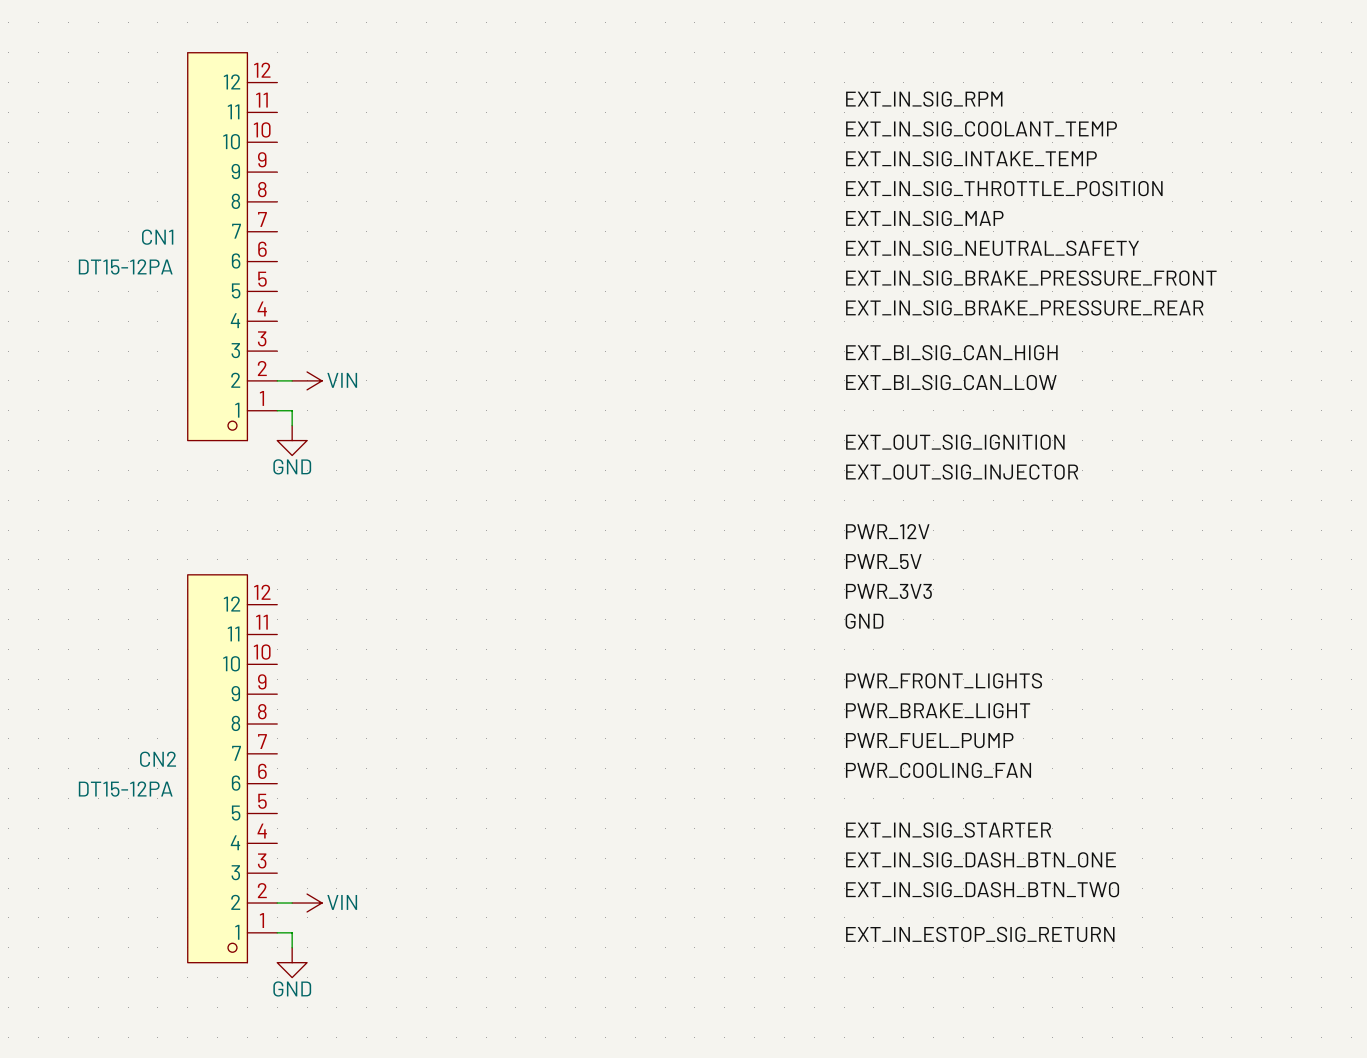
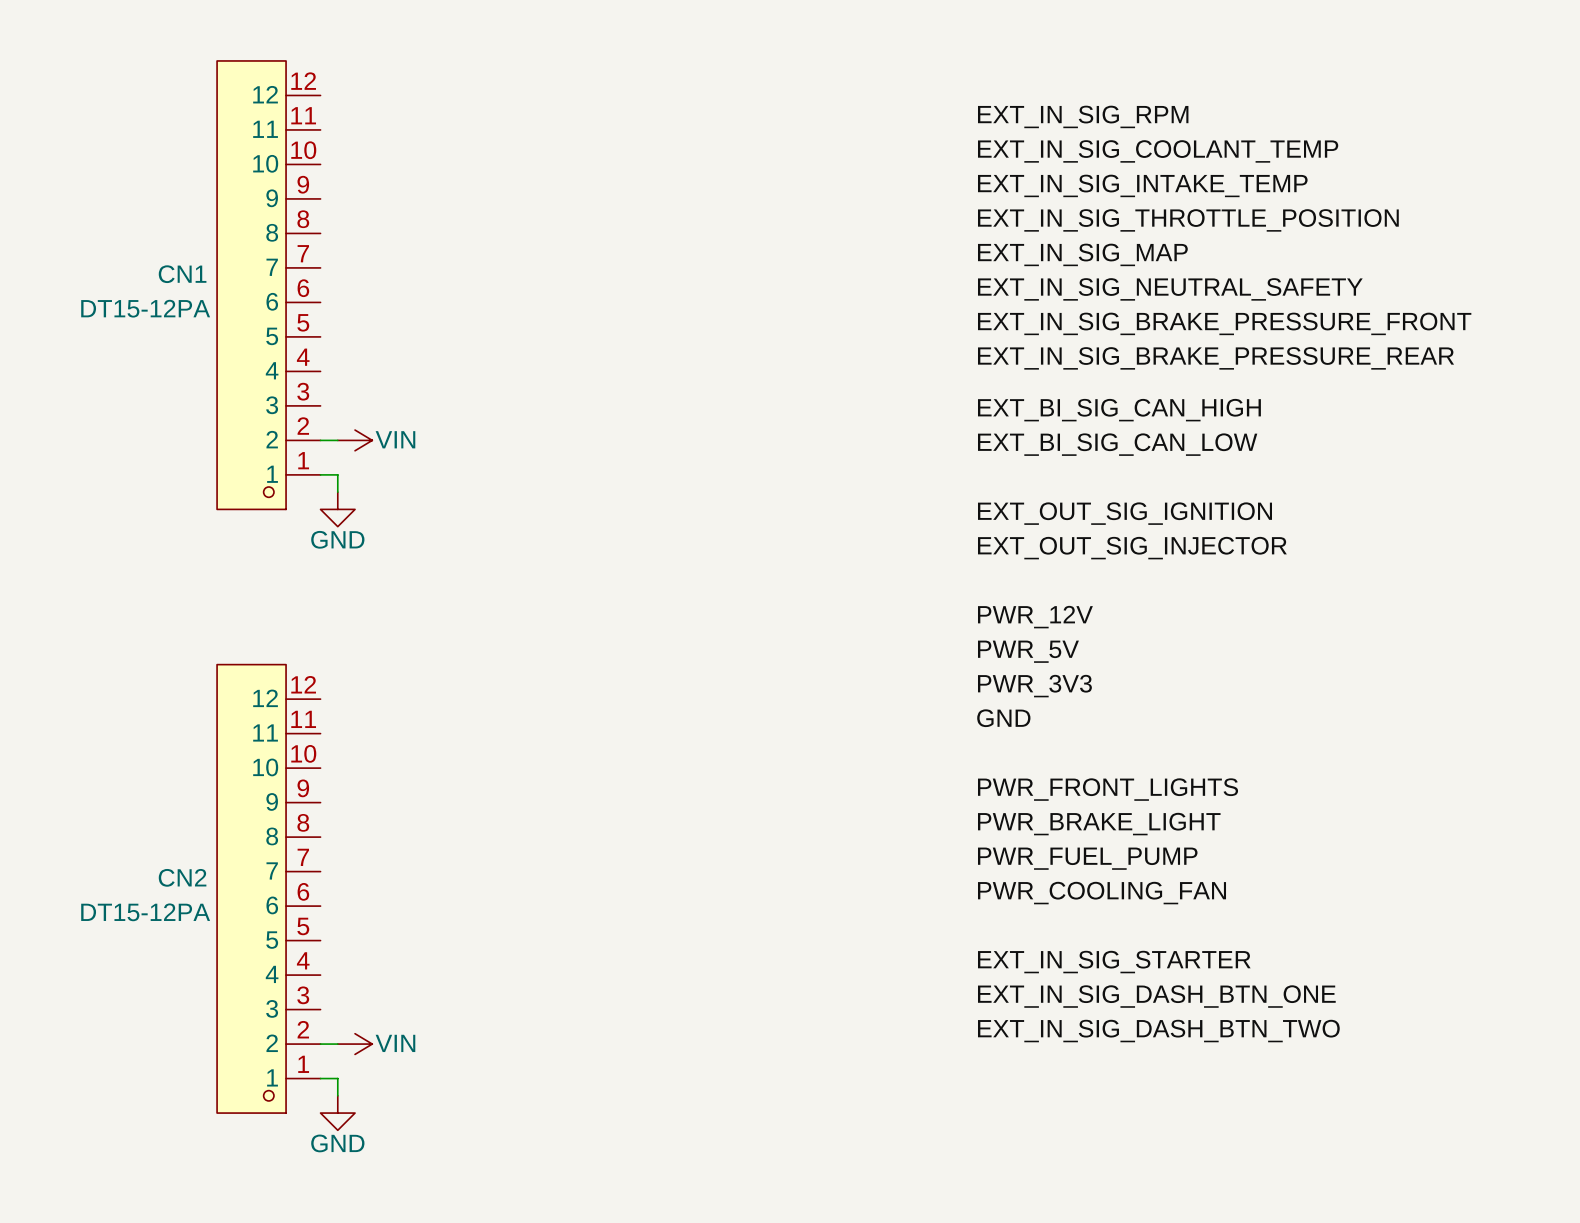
label: EXT_IN_ESTOP_SIG_RETURN (980, 934) -> none

